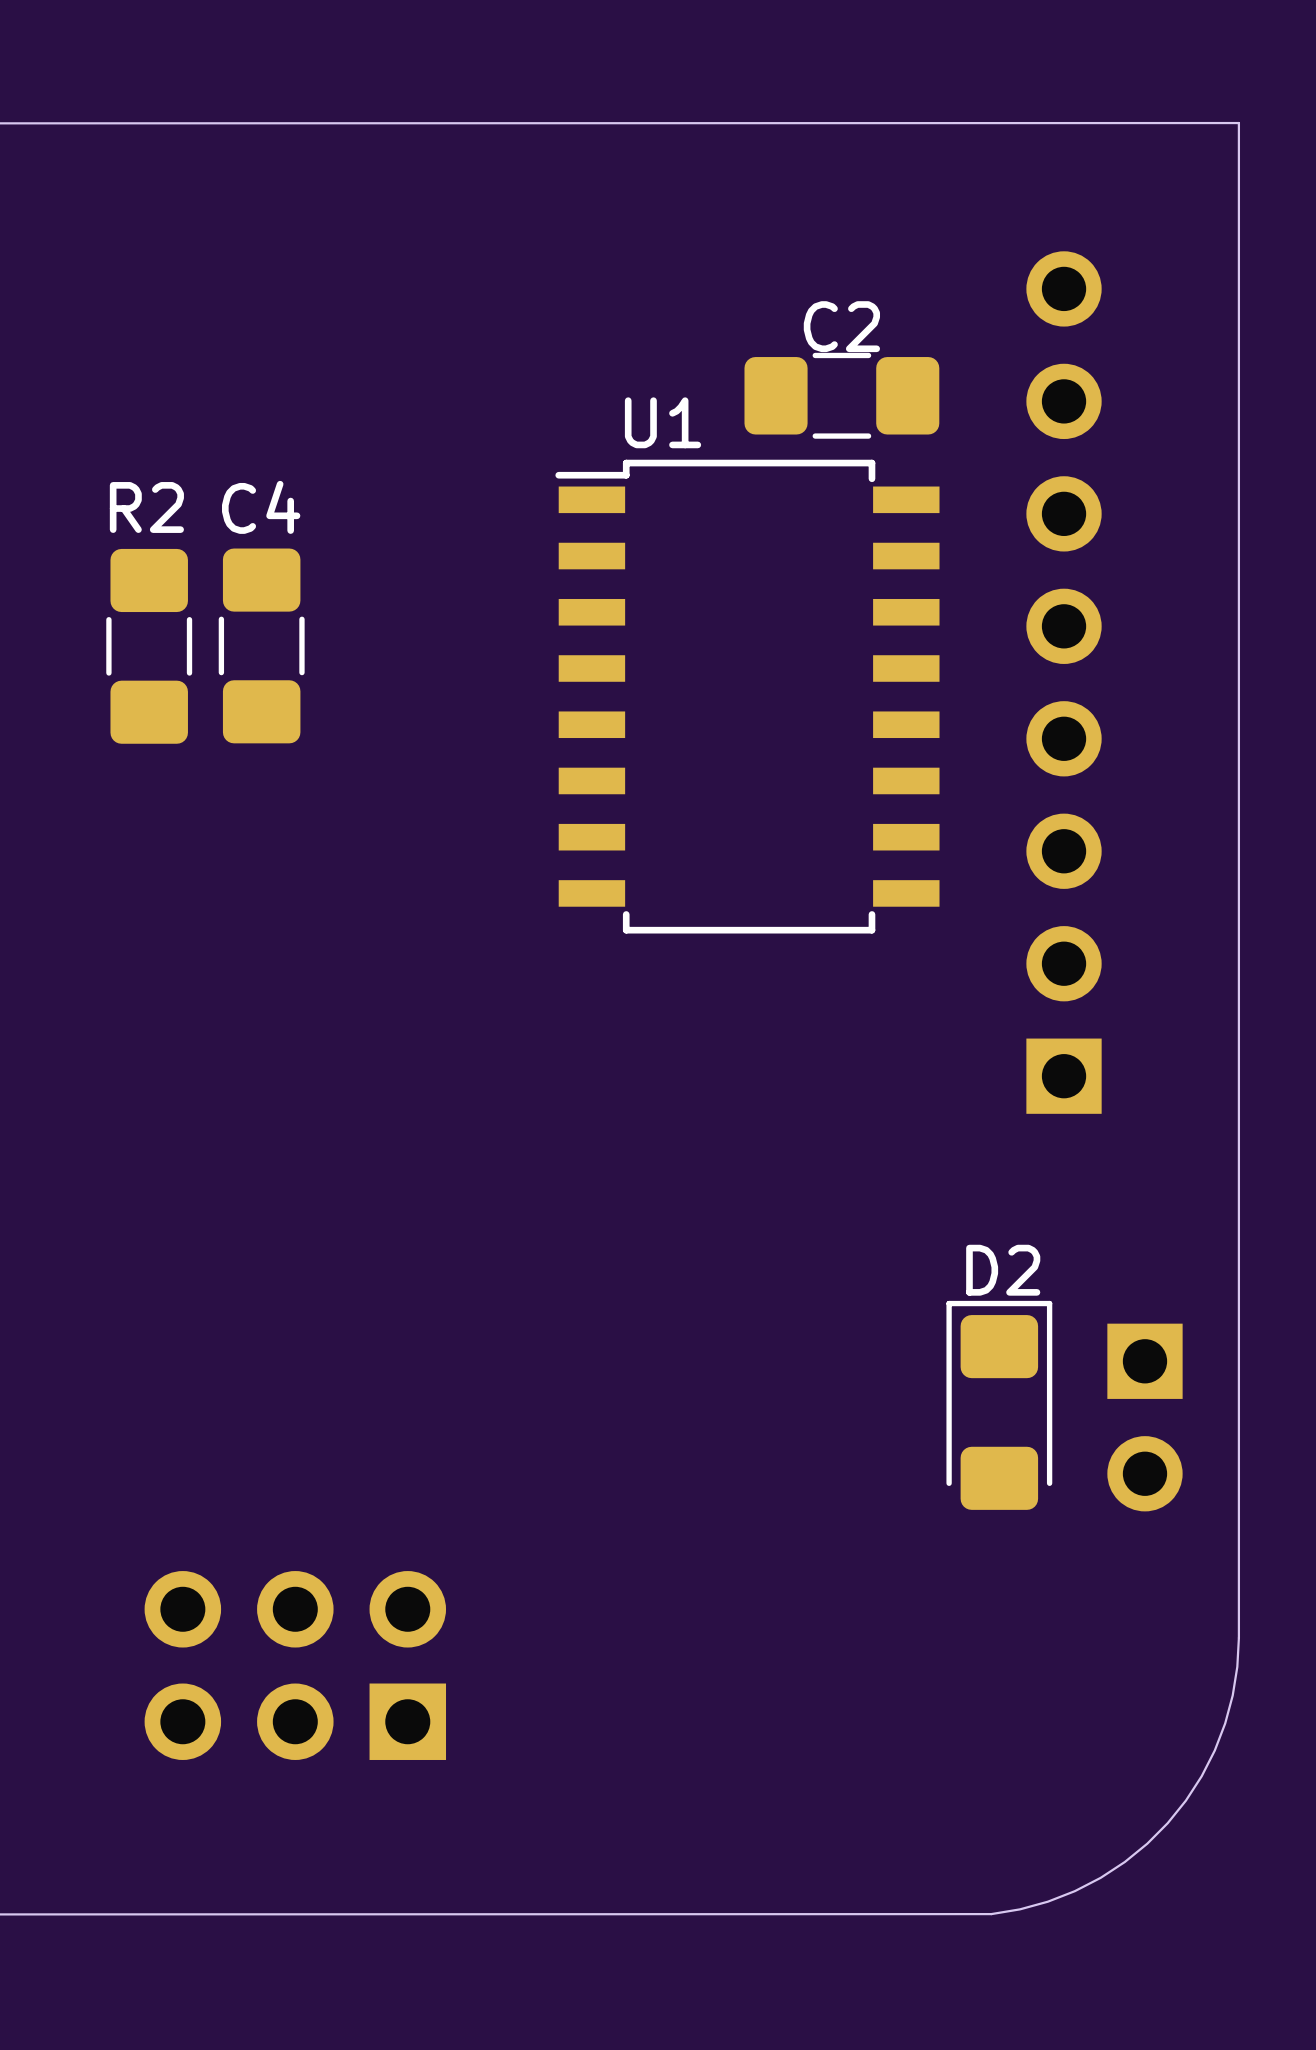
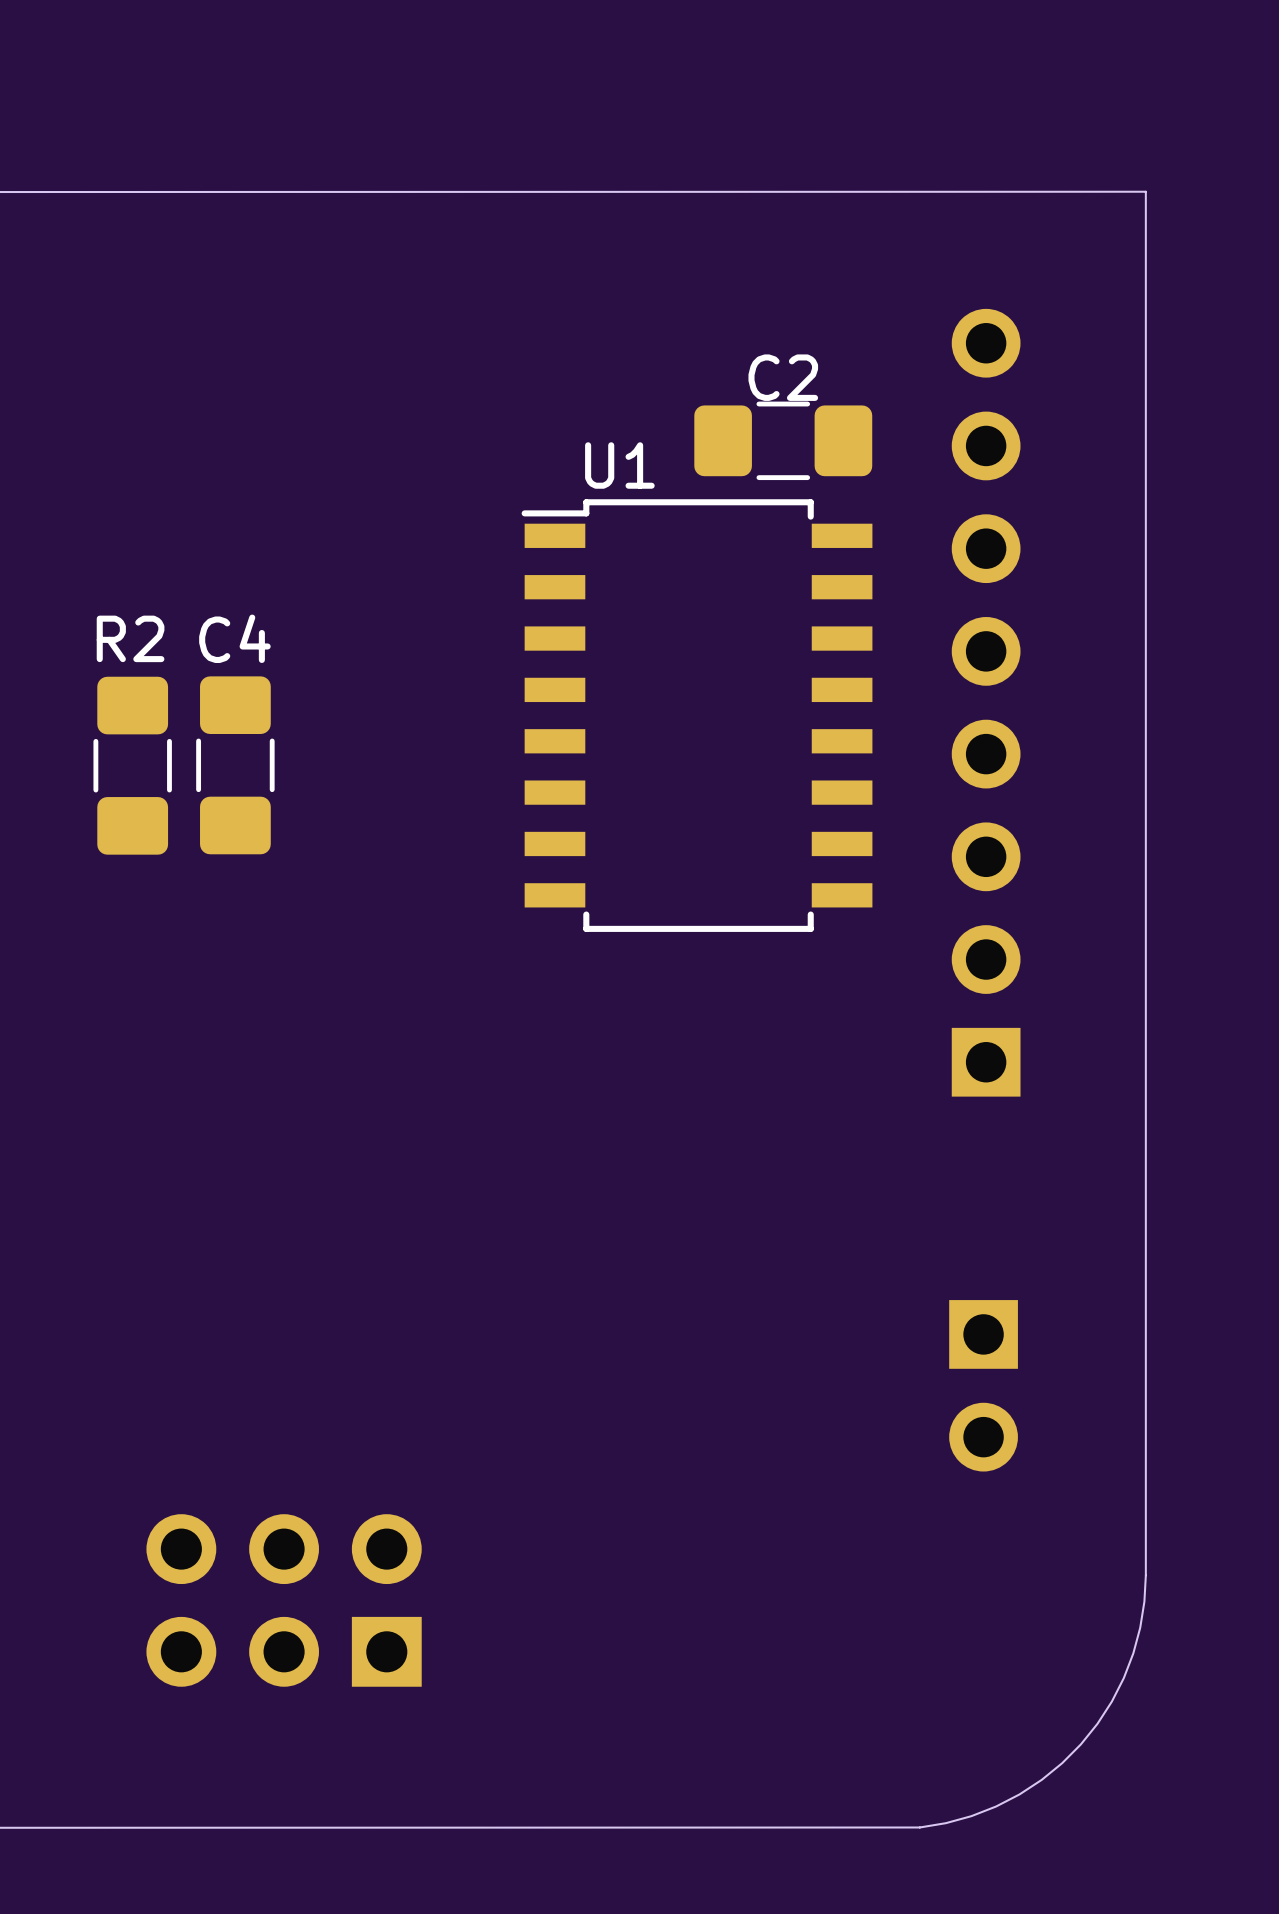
C4 position: (261, 645) -> (235, 765)
R2 position: (149, 646) -> (132, 765)
D2: (999, 1405) -> none
part position: (1144, 1417) -> (983, 1385)

